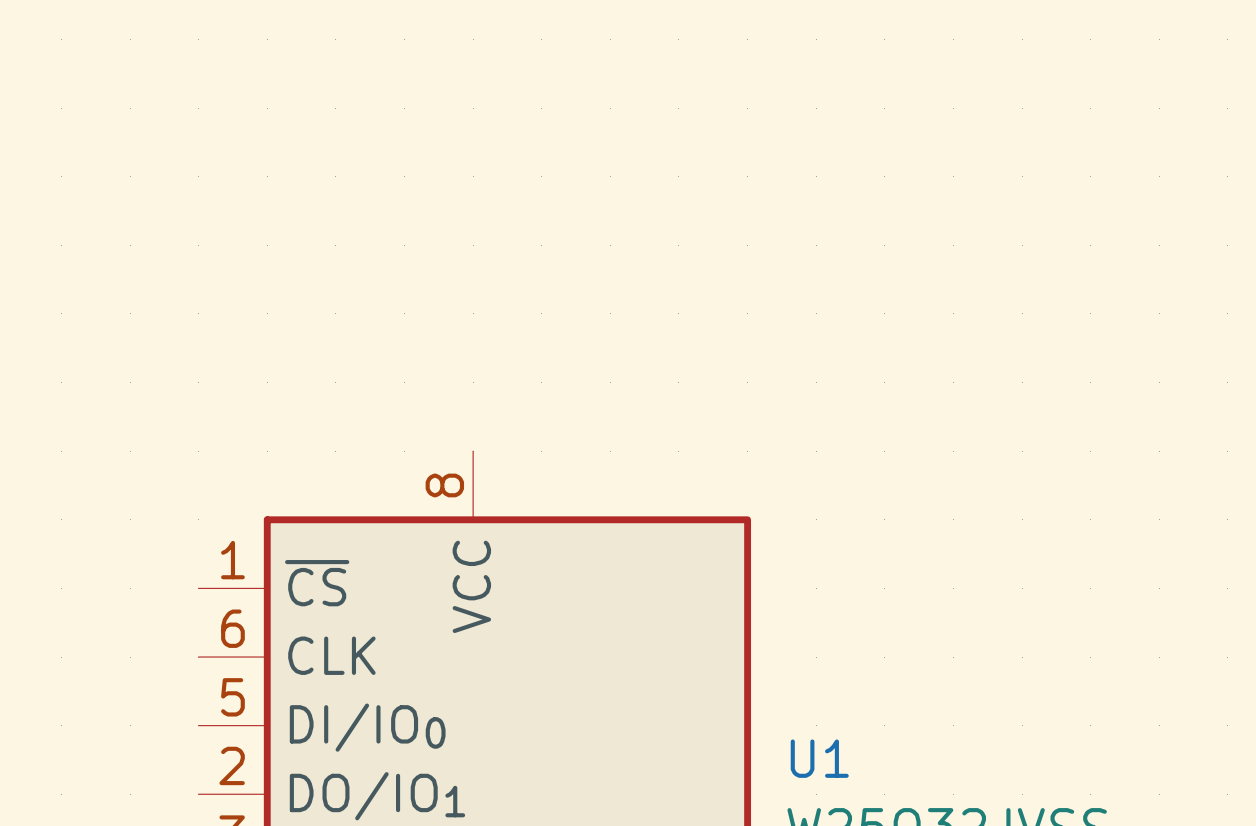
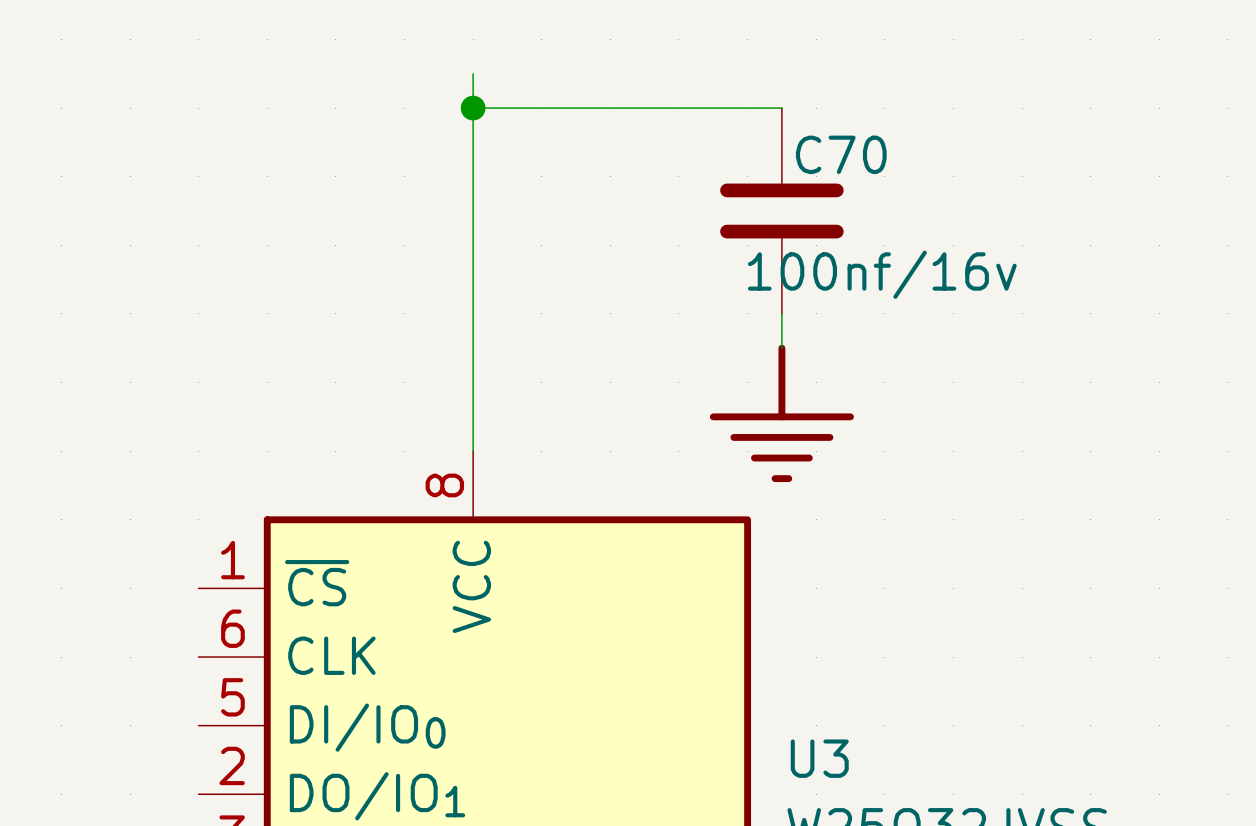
wire: none -> (473, 73) (473, 451)
wire: none -> (473, 108) (781, 108)
junction: none -> (473, 108)
C70: none -> 100nf/16v (781, 211)
wire: none -> (781, 313) (781, 348)
power symbol: none -> (781, 413)
U1 name: U1 (819, 758) -> U3 (819, 758)

